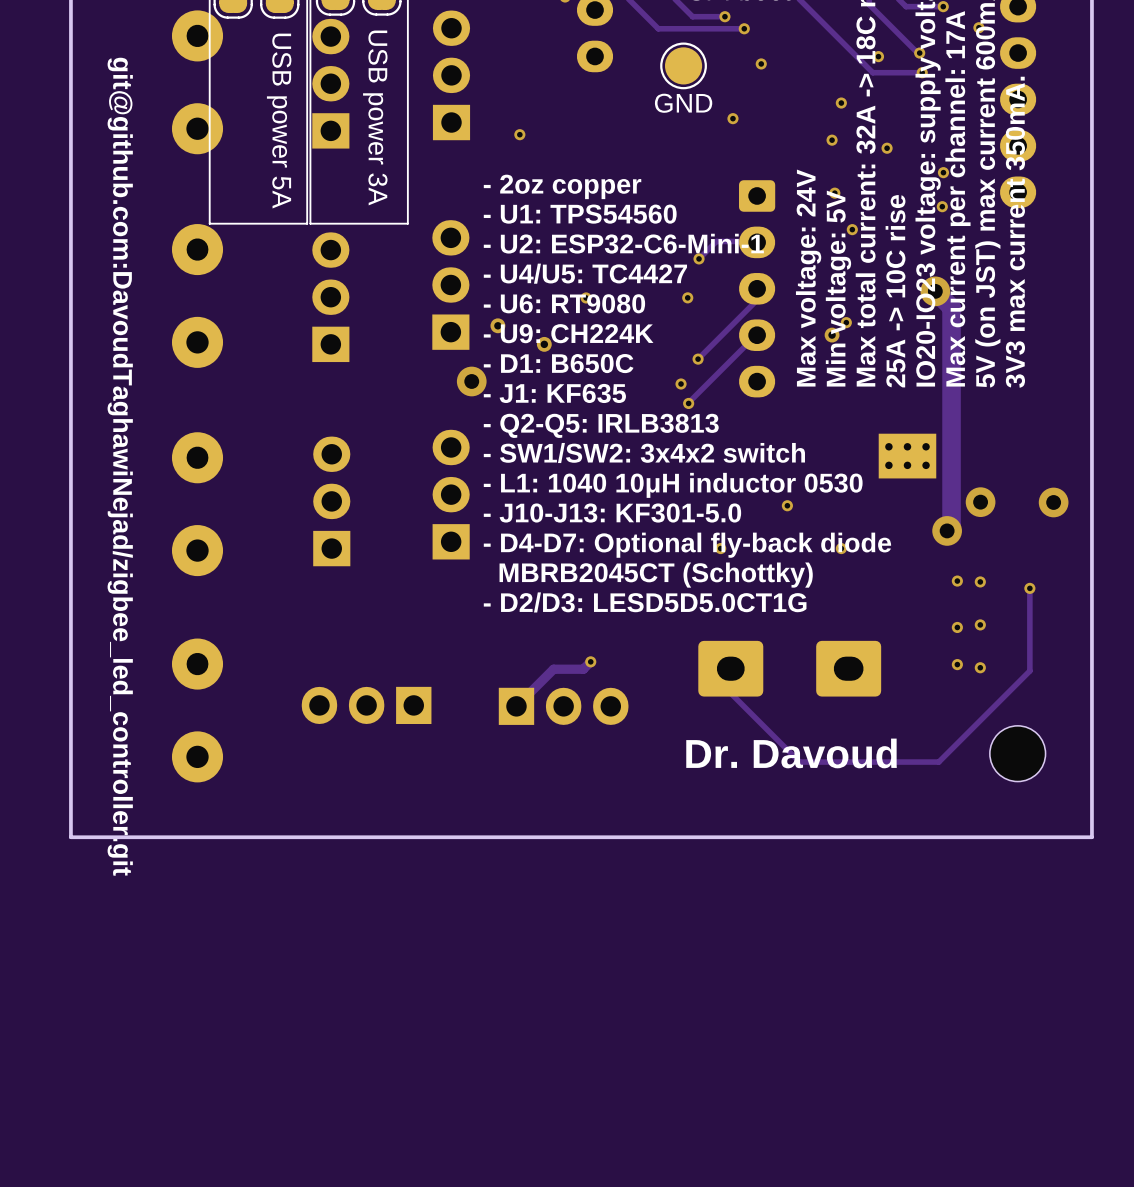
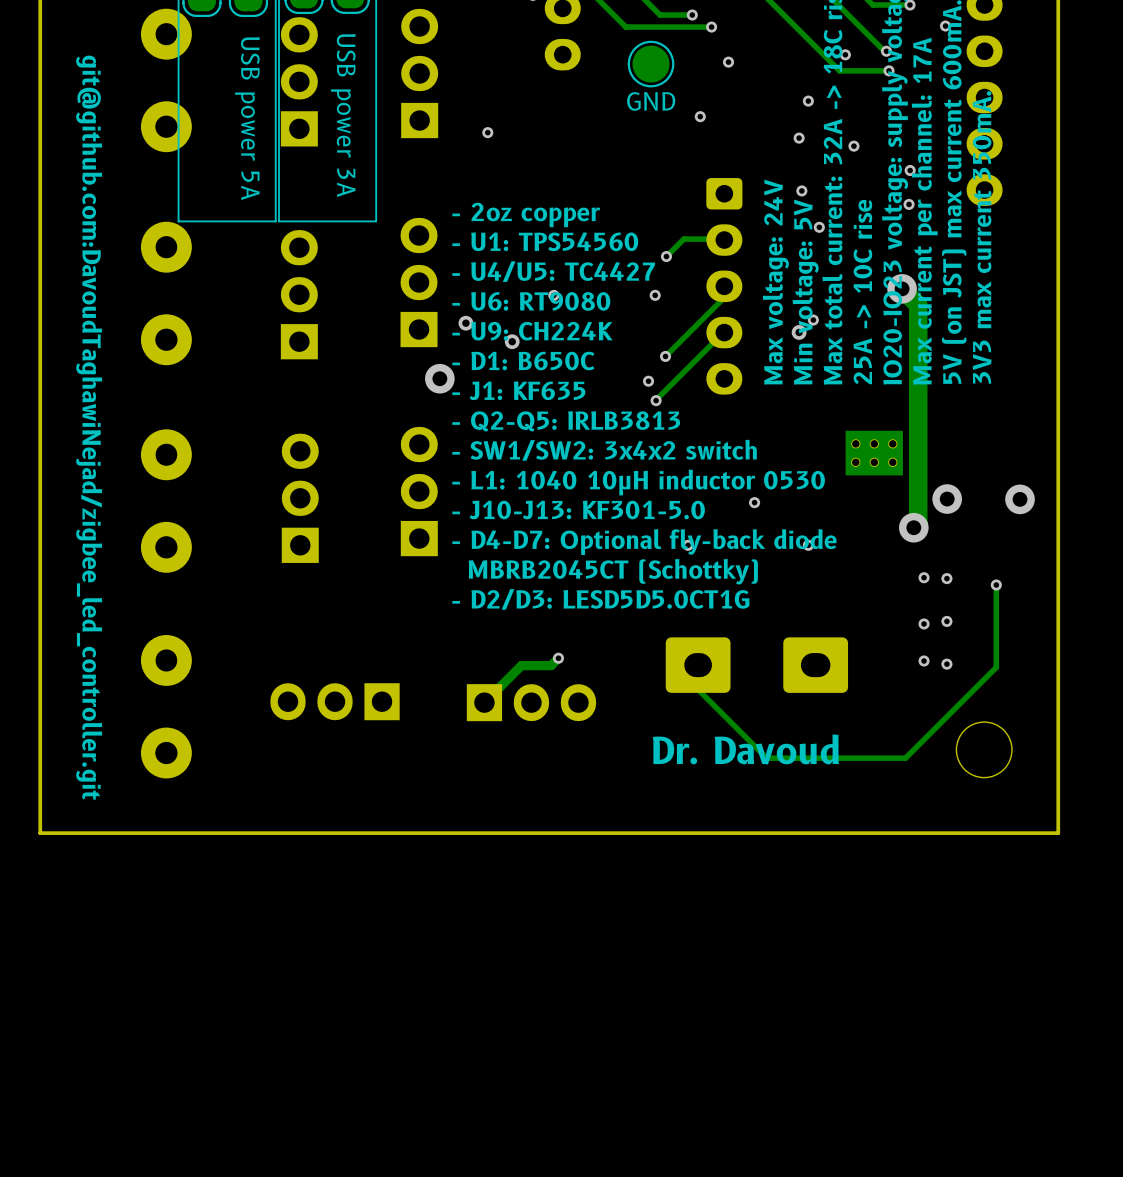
text: - 2oz copper (562, 186) -> none
text: - U1: TPS54560 (580, 214) -> - 2oz copper (526, 214)
text: - U2: ESP32-C6-Mini-1 (623, 243) -> - U1: TPS54560 (545, 241)

